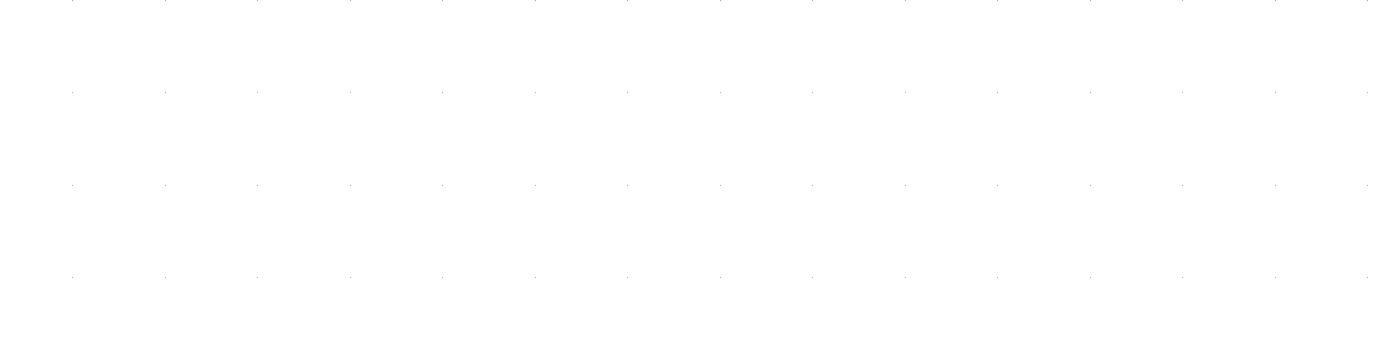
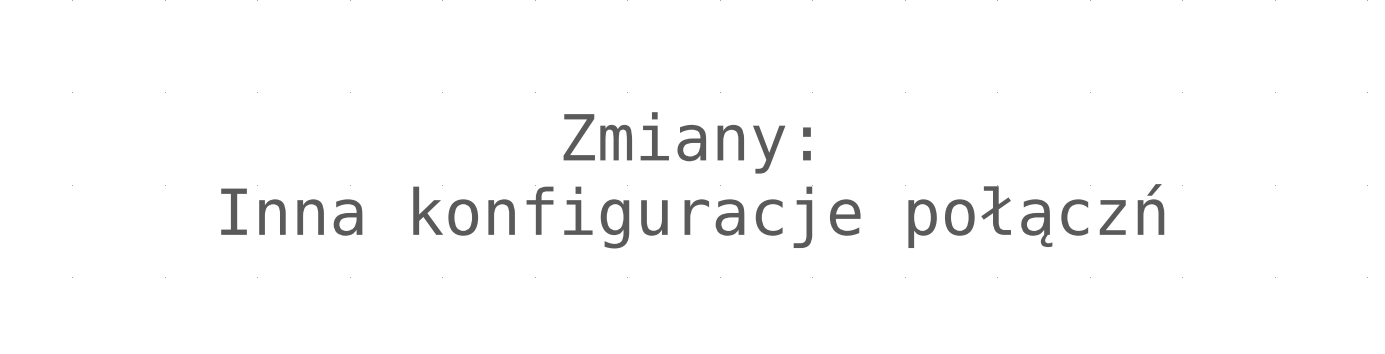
text: none -> Zmiany: (687, 142)
text: none -> Inna konfiguracje połączń (692, 216)

